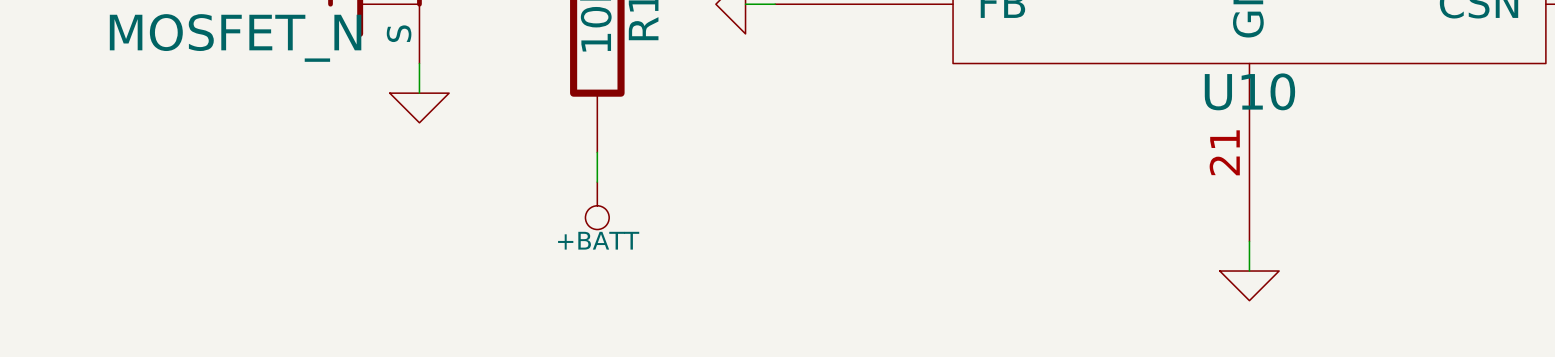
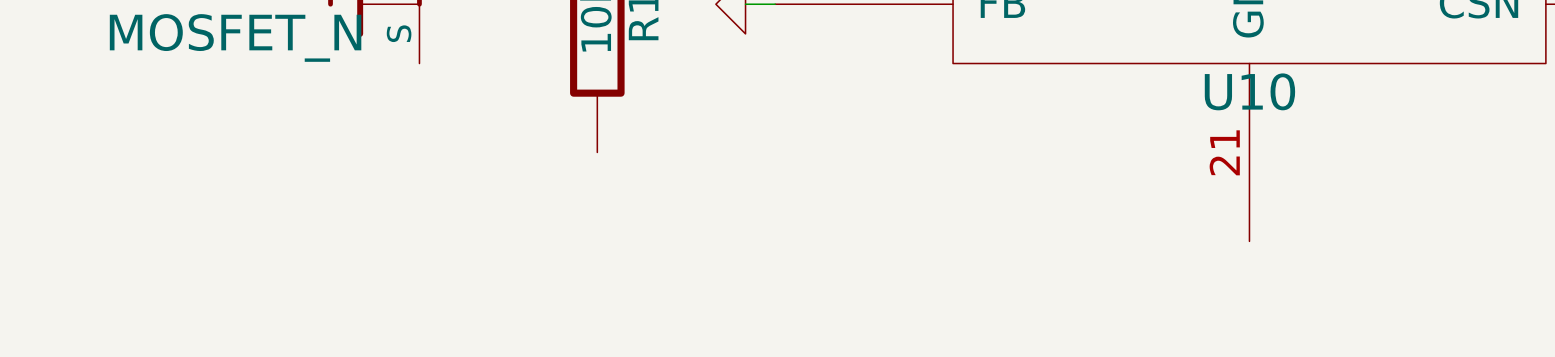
wire: (419, 63) (419, 93) -> none
power symbol: (419, 107) -> none
wire: (597, 152) (597, 182) -> none
power symbol: +BATT (597, 205) -> none
wire: (1249, 241) (1249, 271) -> none
power symbol: (1249, 285) -> none

